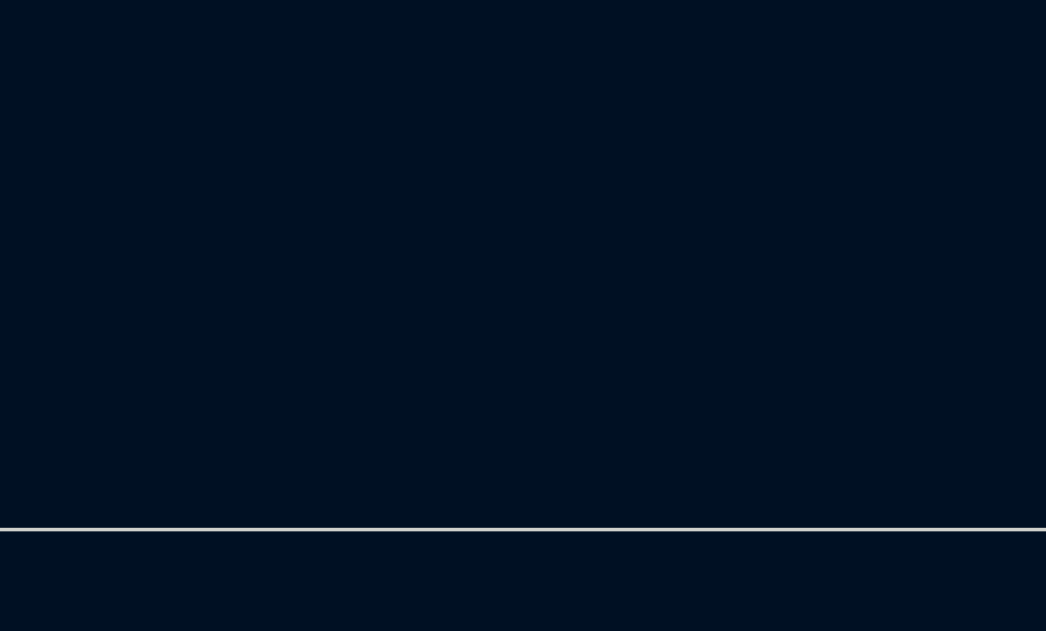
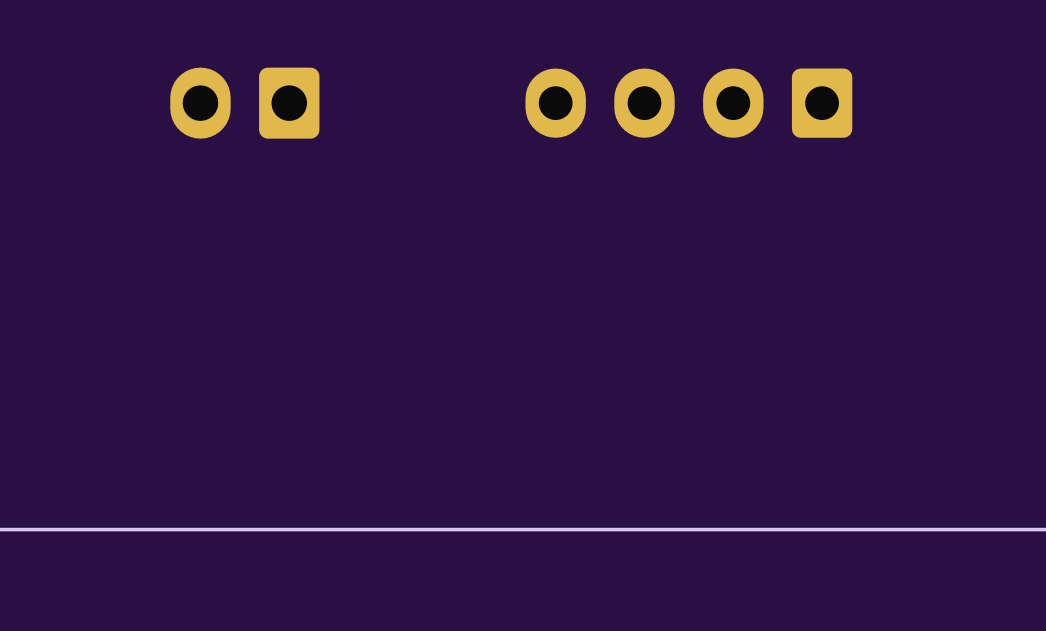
part: none -> (244, 103)
part: none -> (688, 103)

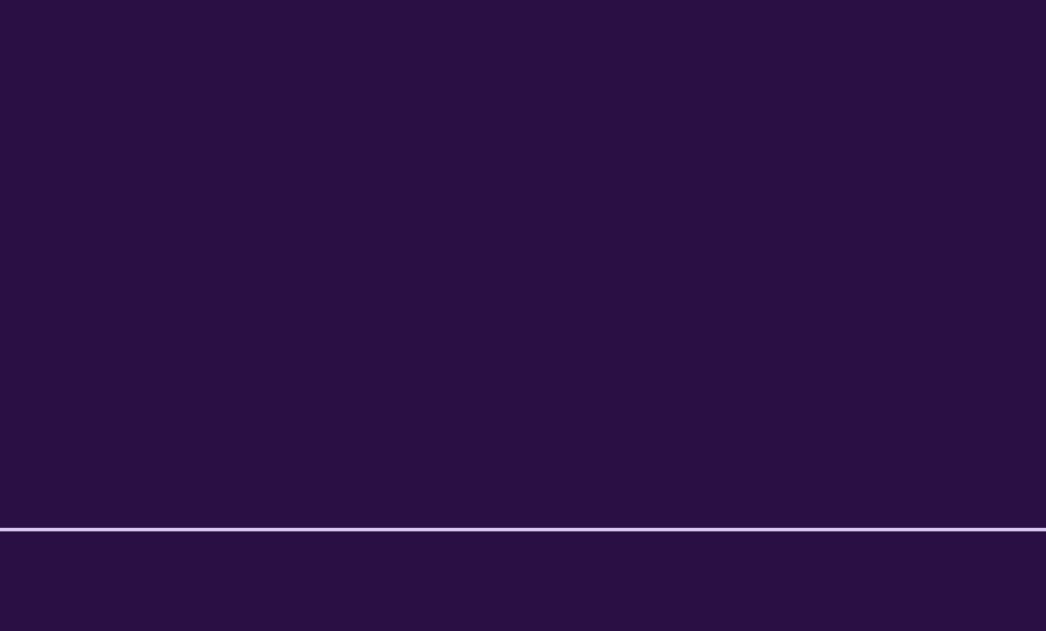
part: (244, 103) -> none
part: (688, 103) -> none

